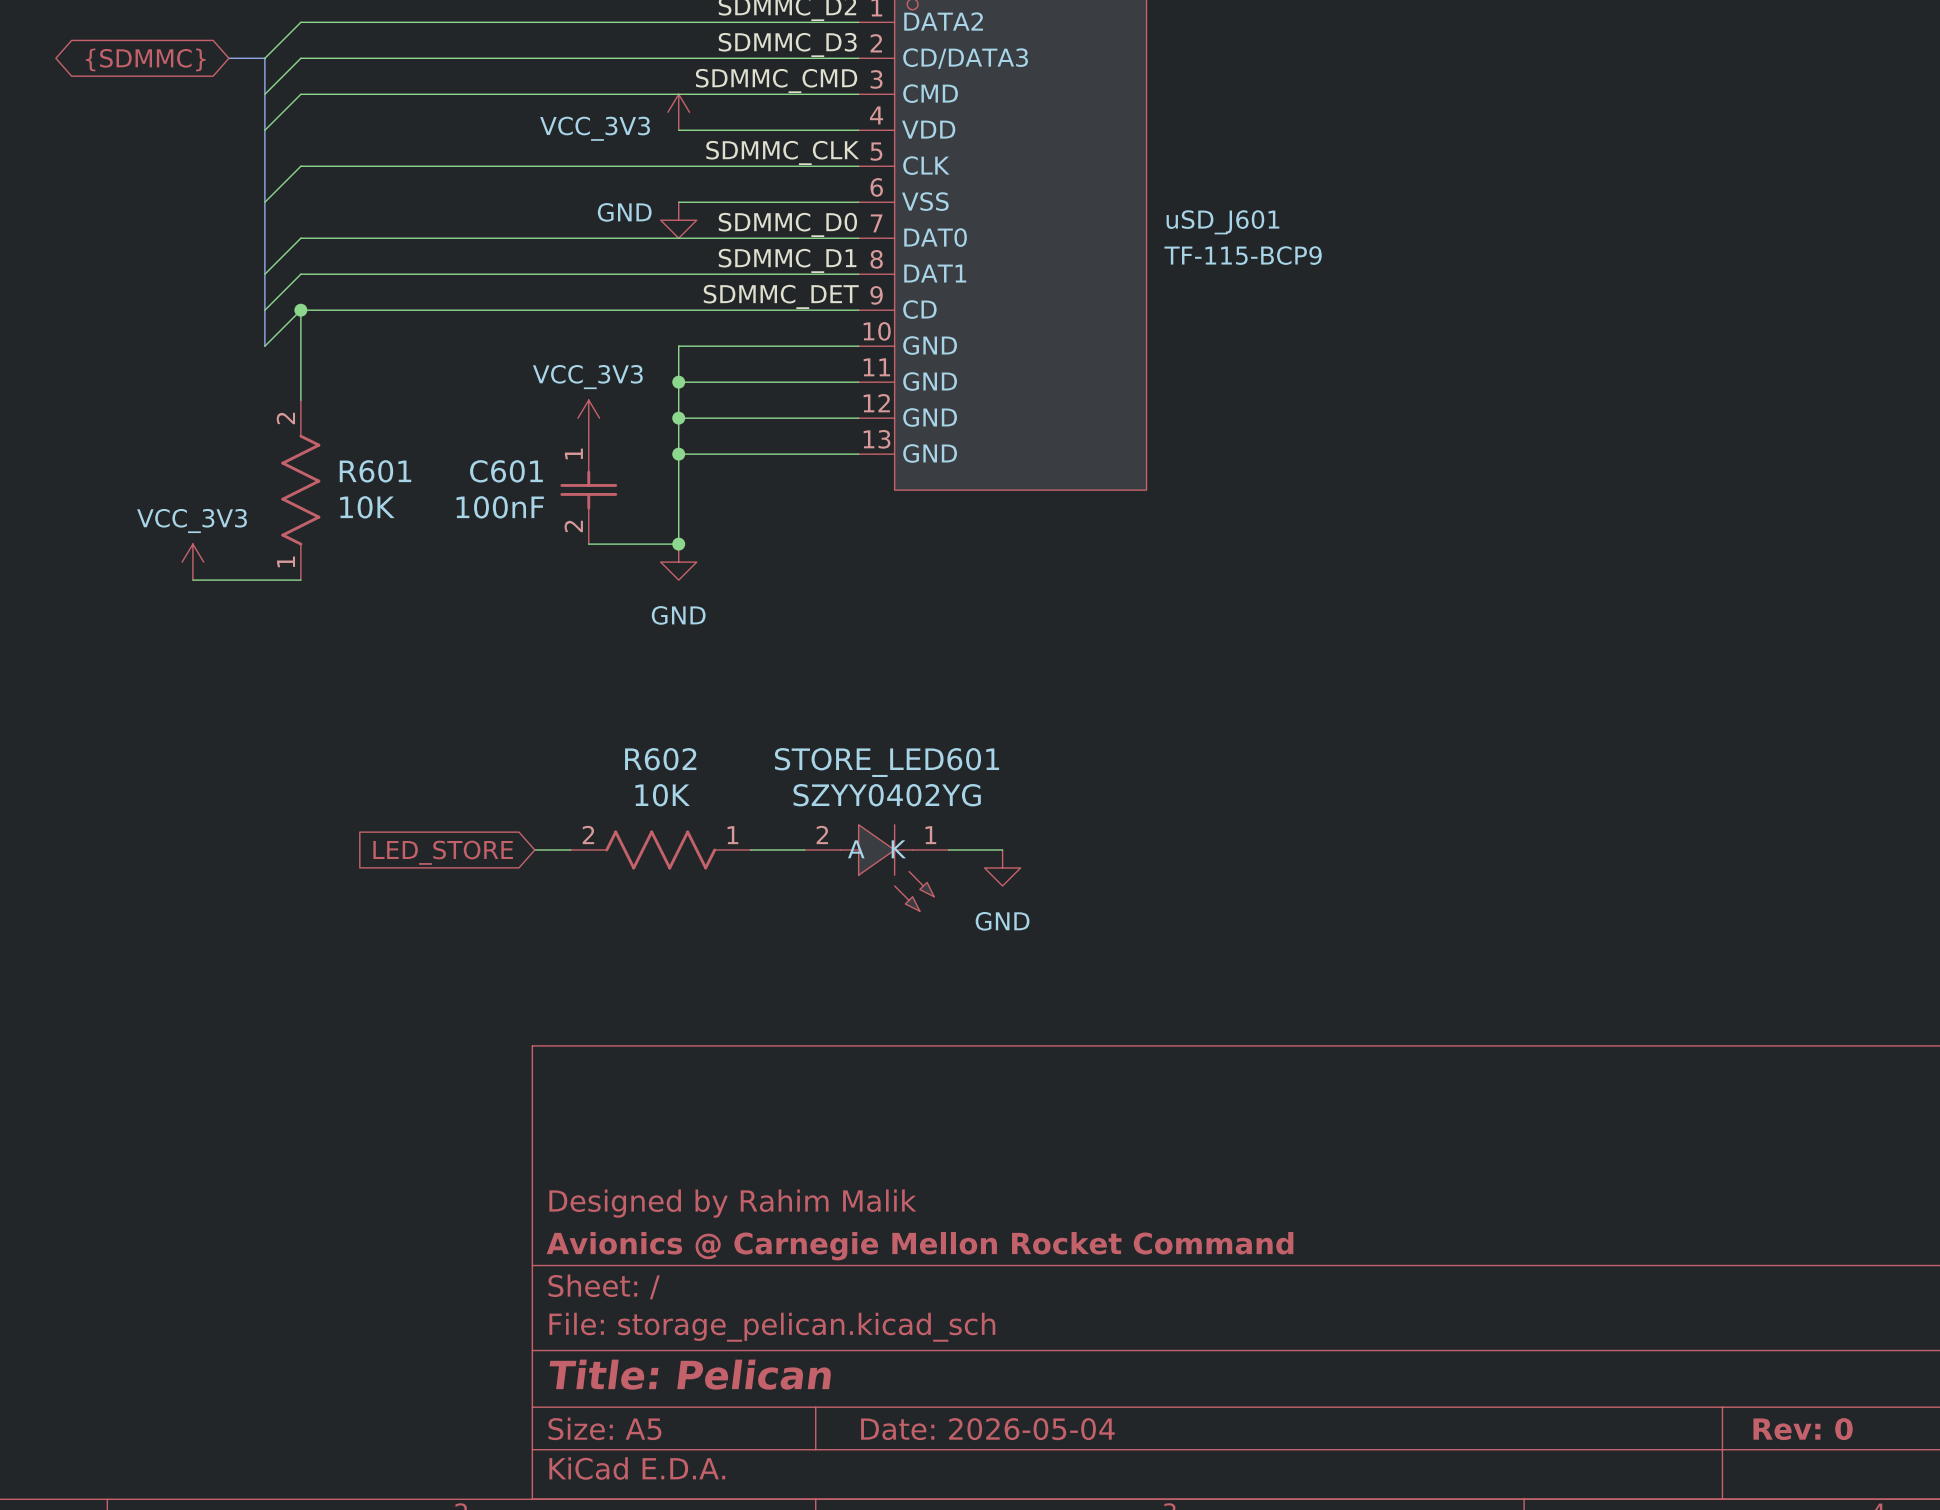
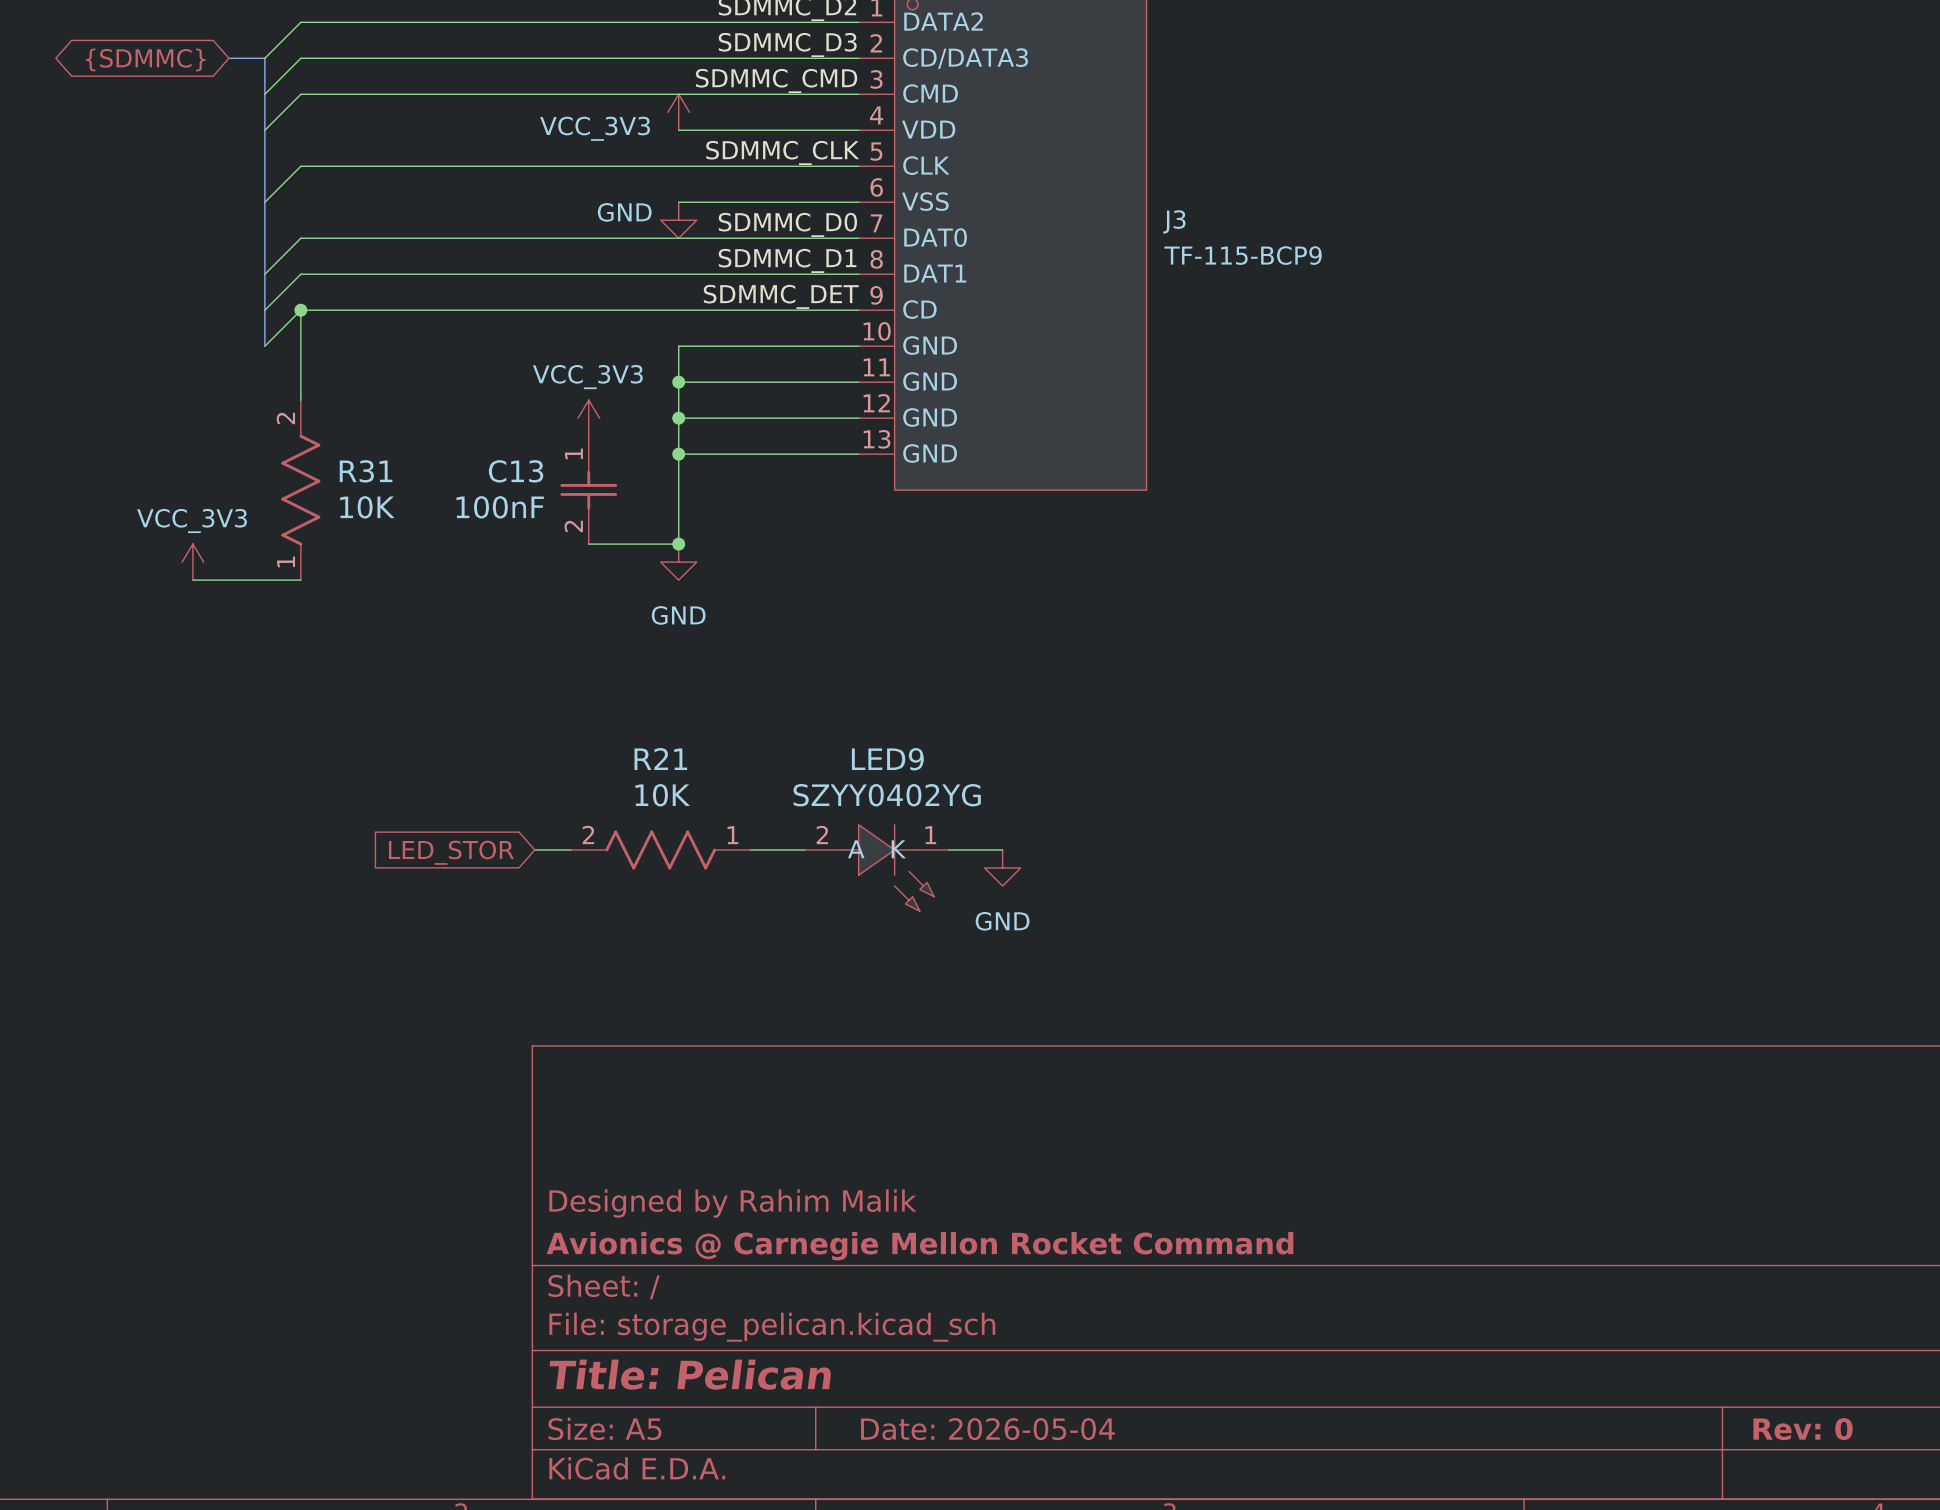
uSD_J601 name: uSD_J601 (1222, 222) -> J3 (1174, 221)
R601 name: R601 (375, 471) -> R31 (366, 471)
C601 name: C601 (506, 471) -> C13 (516, 471)
R602 name: R602 (660, 759) -> R21 (660, 759)
STORE_LED601 name: STORE_LED601 (887, 762) -> LED9 (887, 759)
global label: LED_STORE (443, 852) -> LED_STOR (451, 852)

